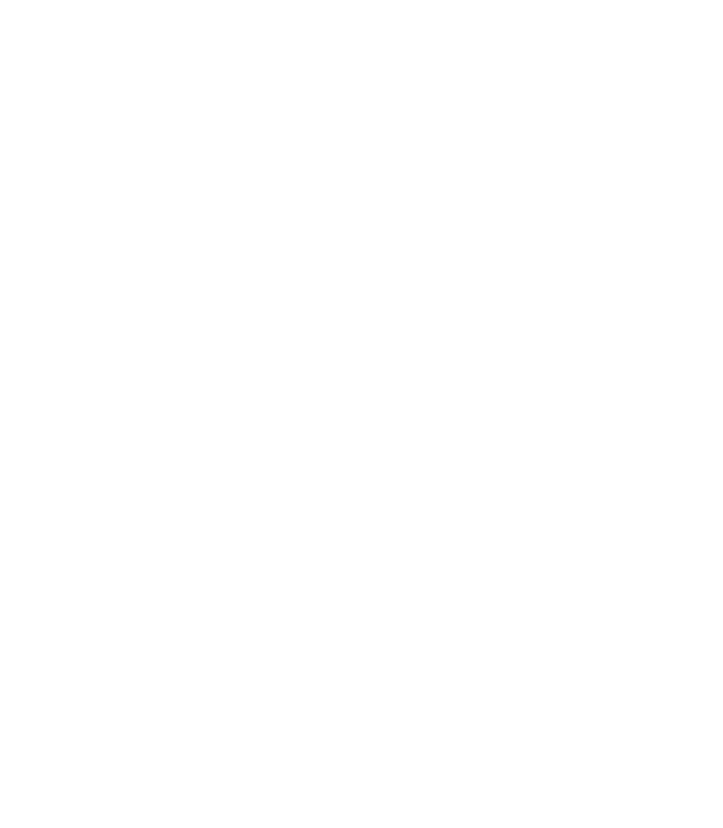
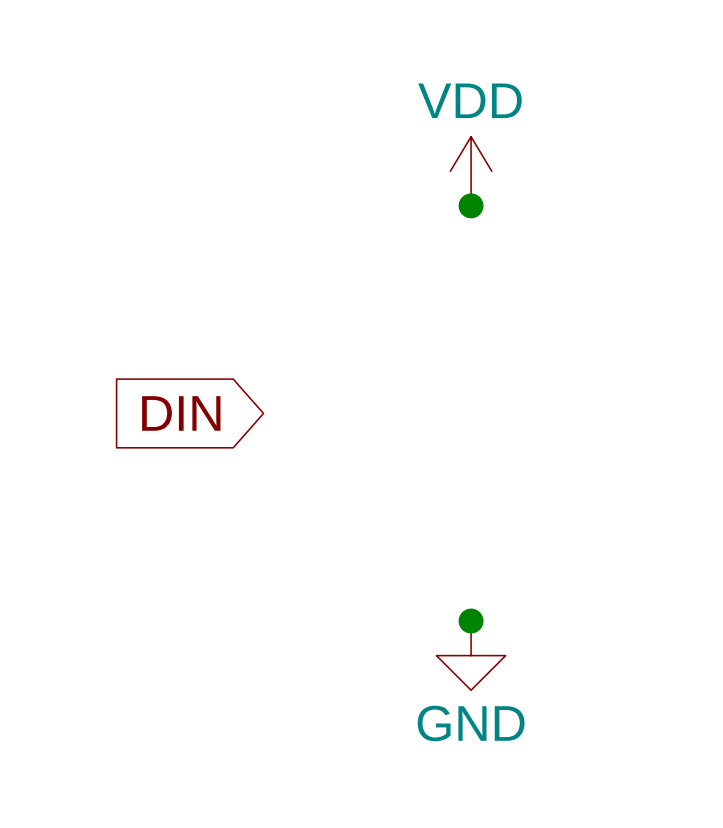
power symbol: none -> VDD (471, 171)
junction: none -> (471, 205)
global label: none -> DIN (181, 413)
junction: none -> (471, 621)
power symbol: none -> GND (471, 655)

